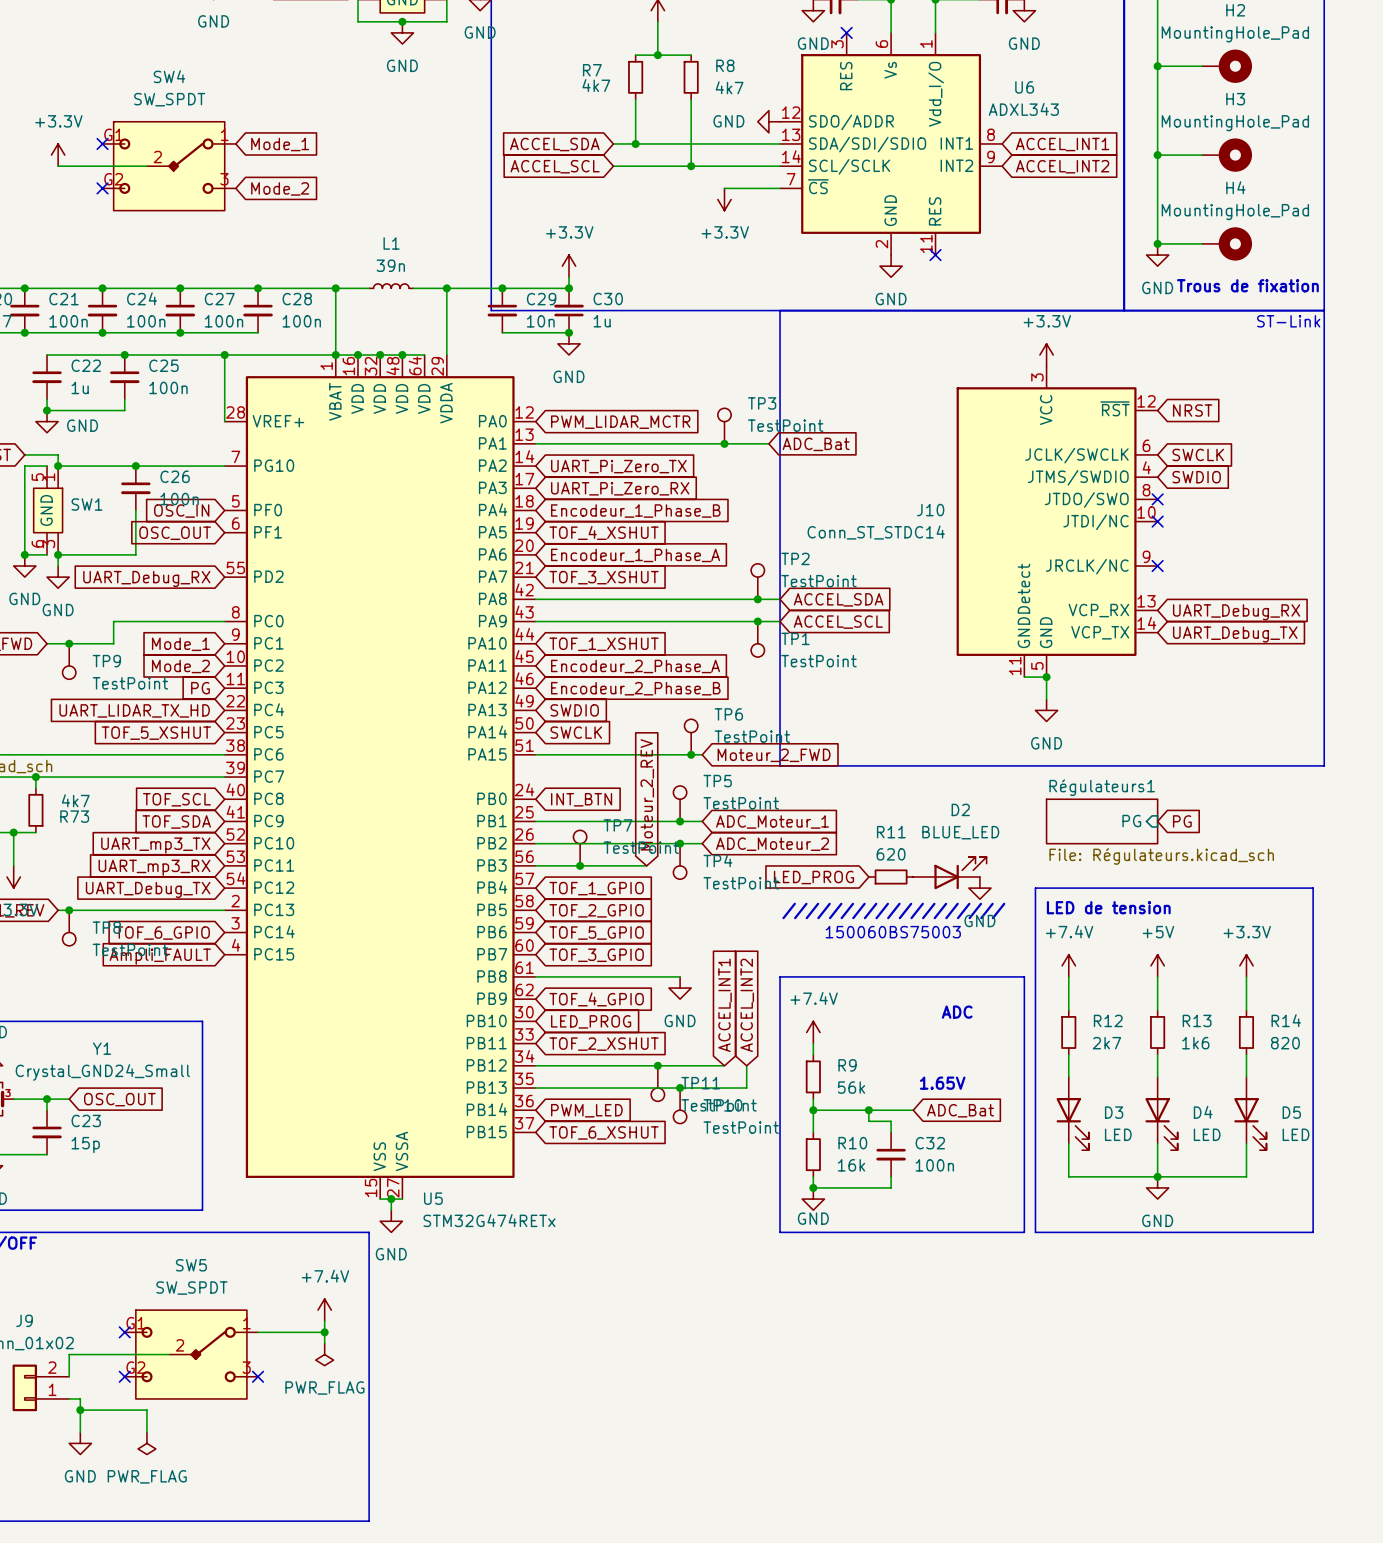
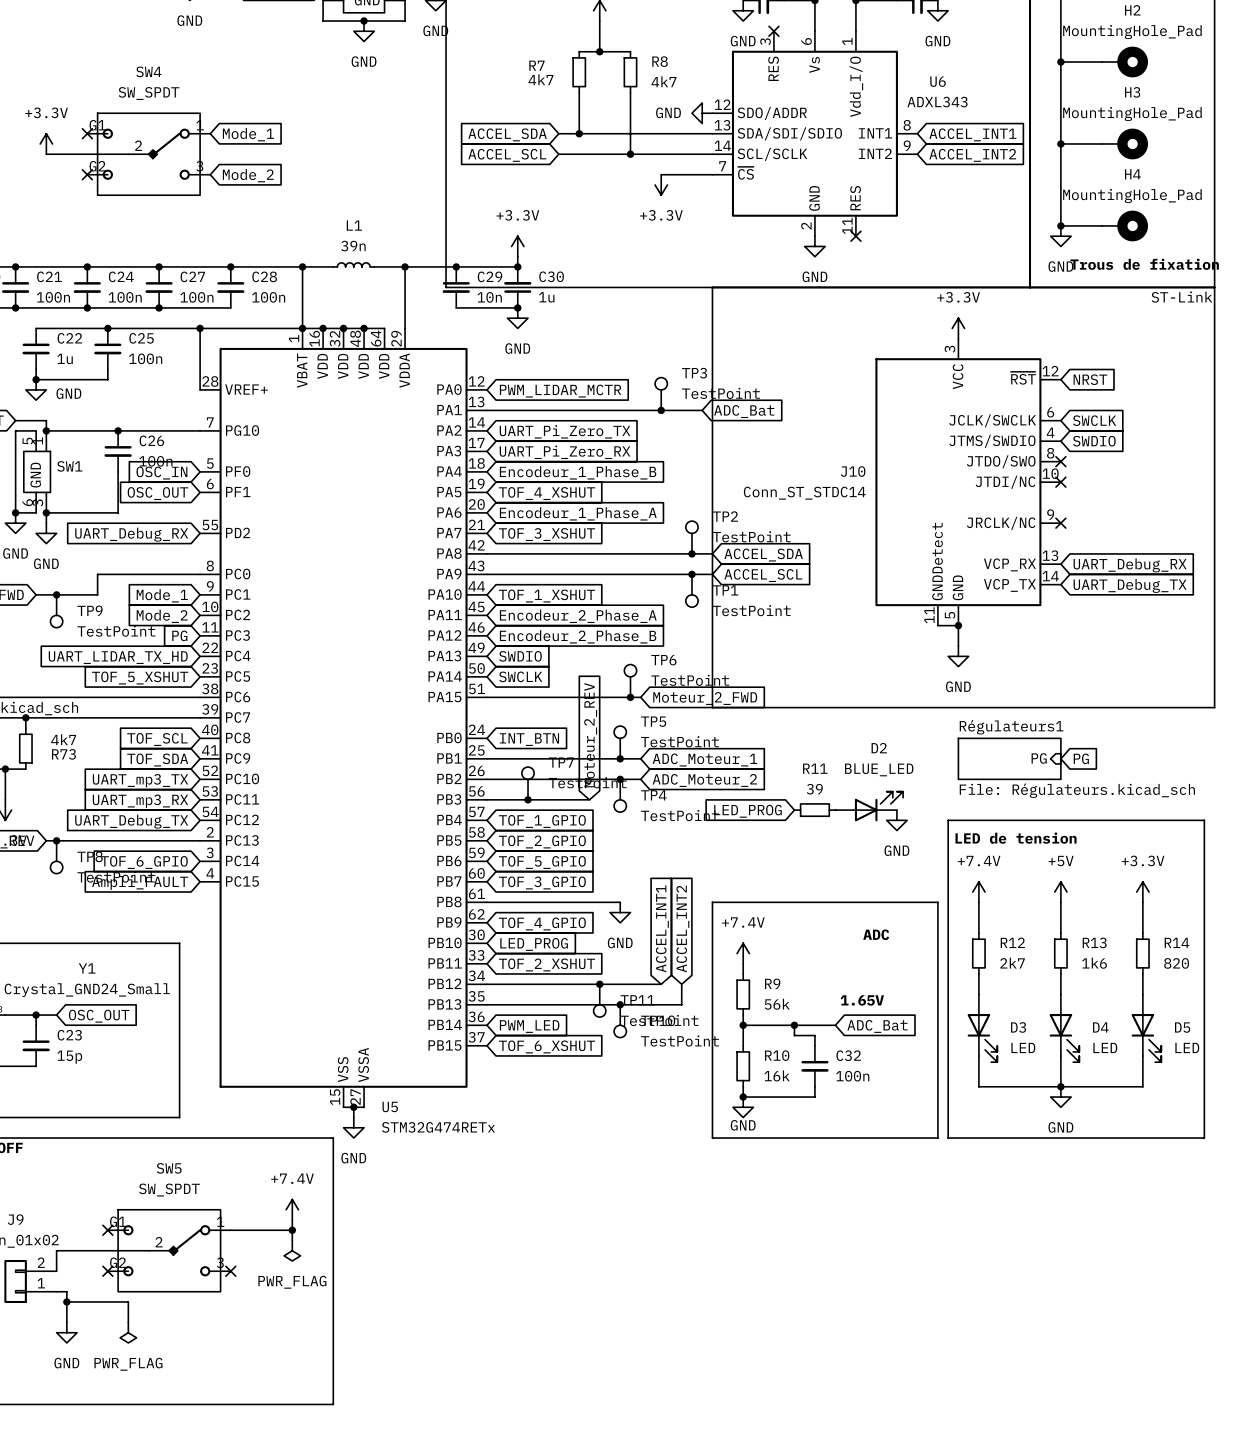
R11 value: 620 (891, 854) -> 39 (814, 789)
text: /////////////////// (893, 910) -> none
text: 150060BS75003 (893, 932) -> none

